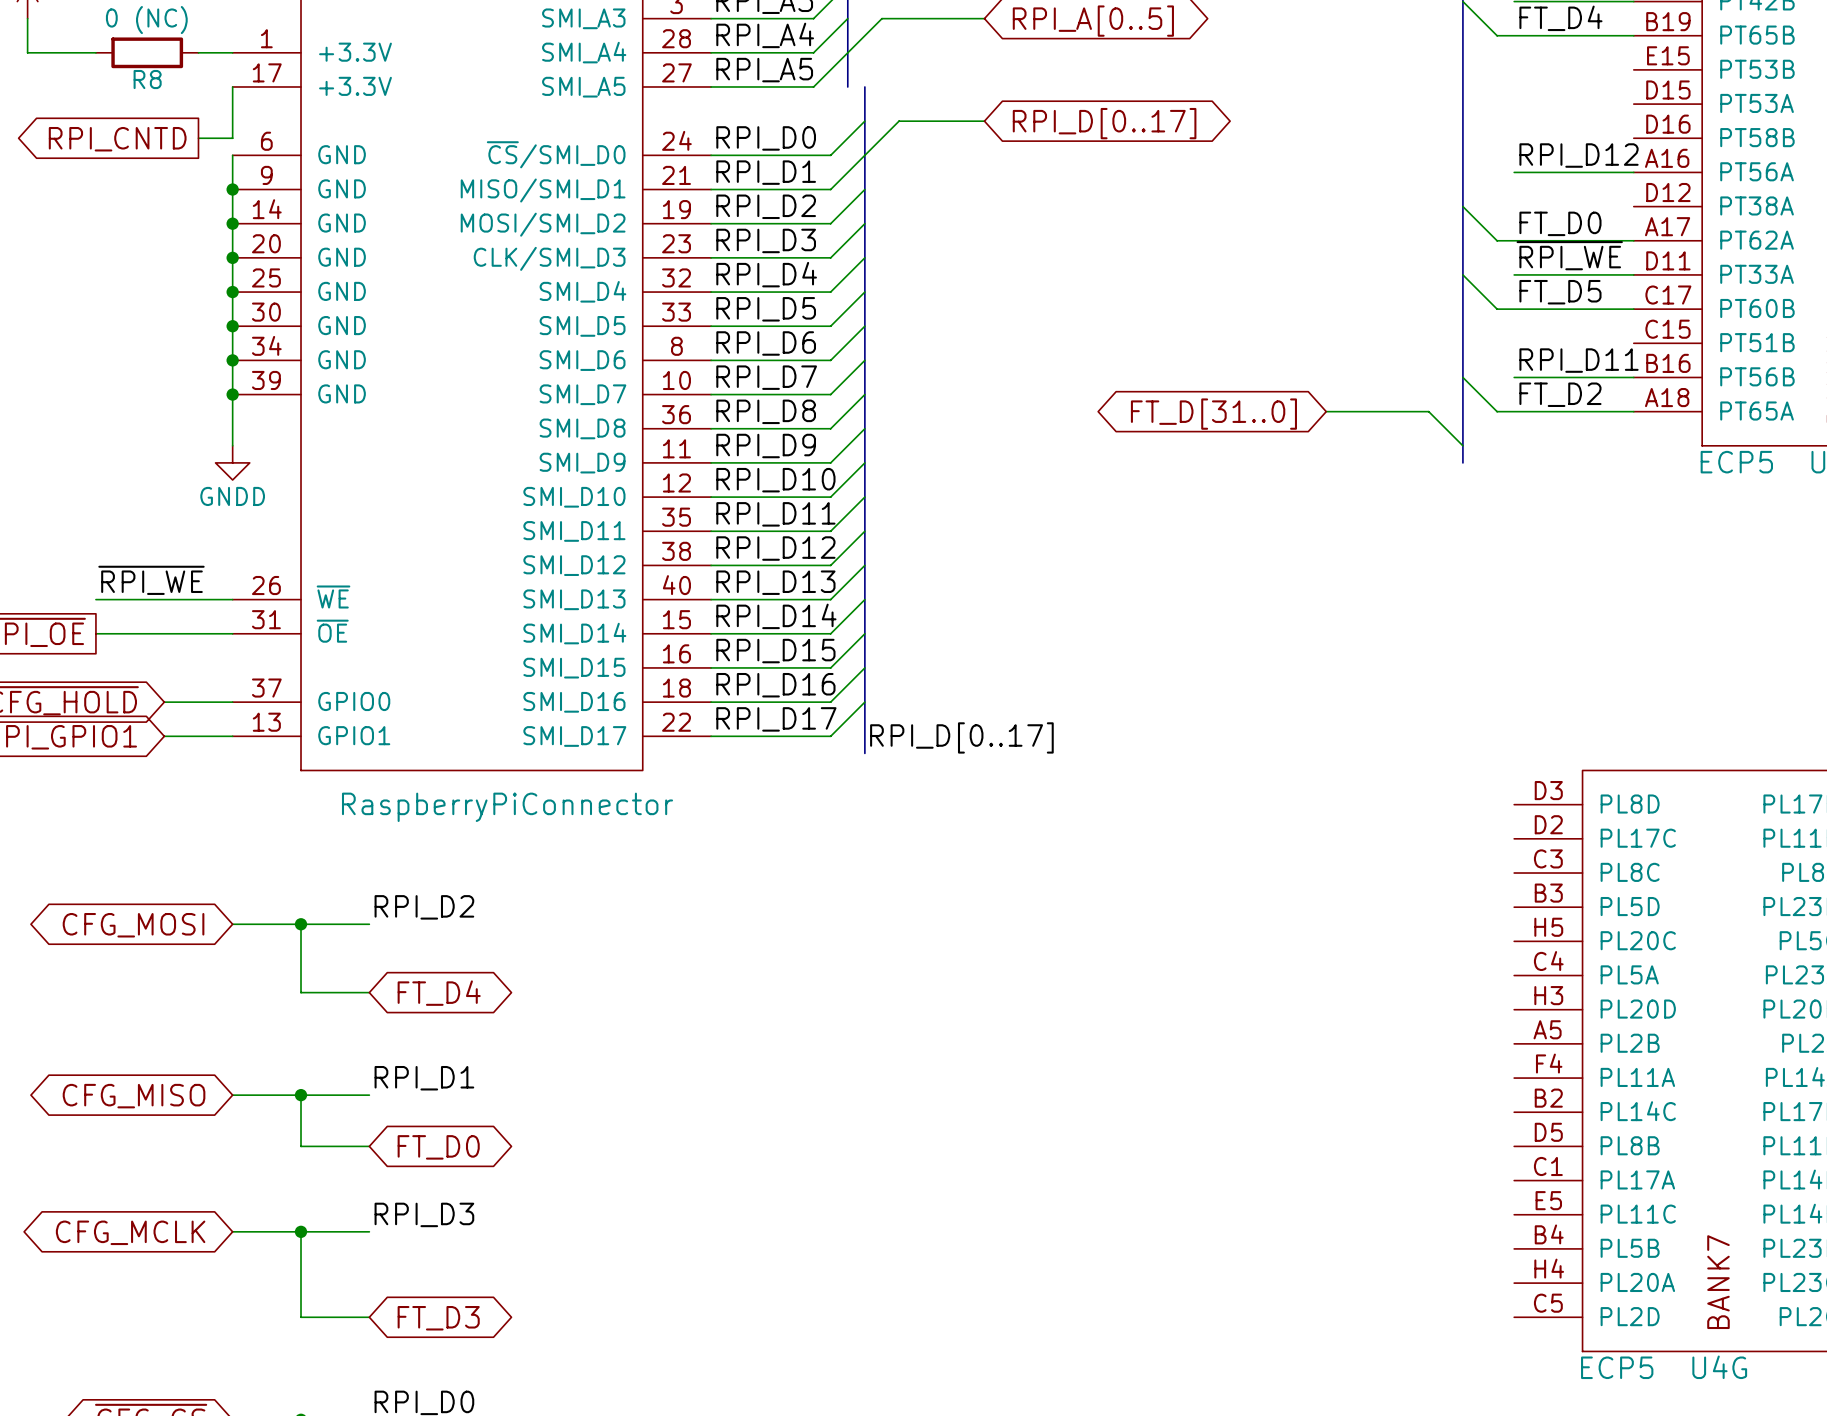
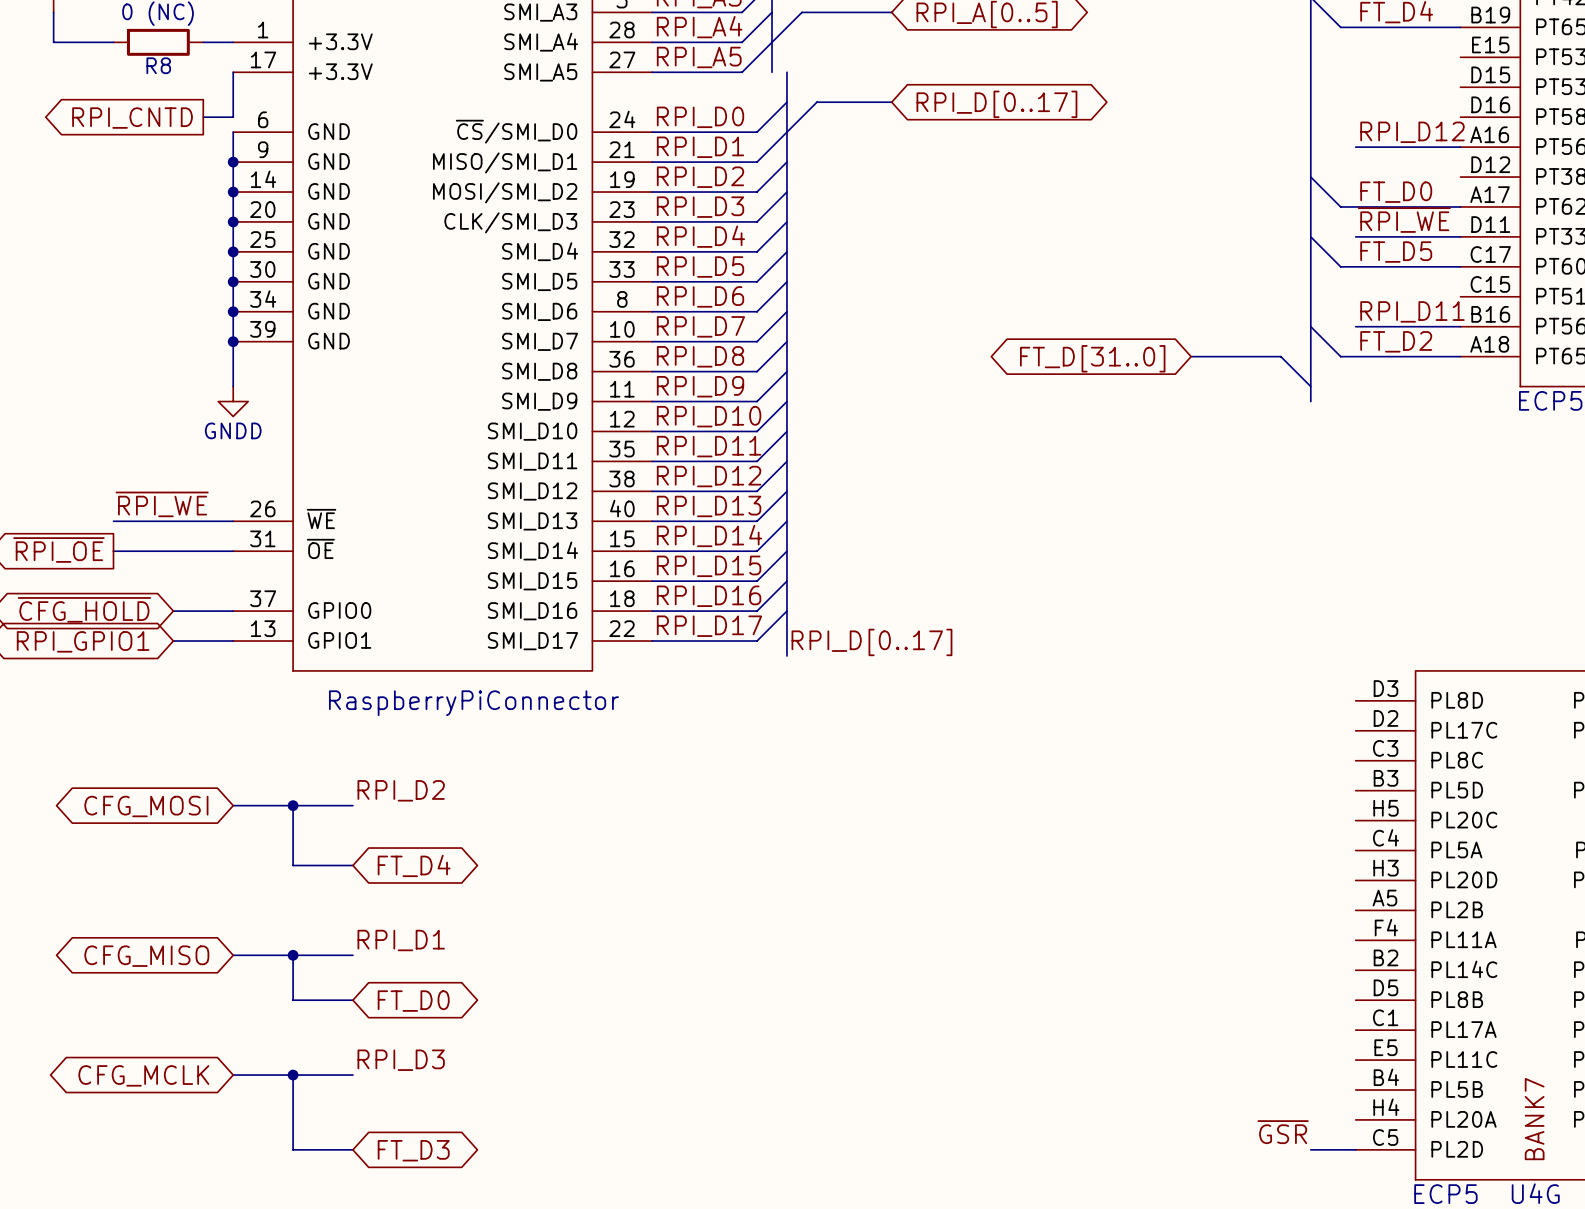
label: none -> ~{GSR} (1283, 1132)
wire: none -> (1310, 1149) (1355, 1149)

